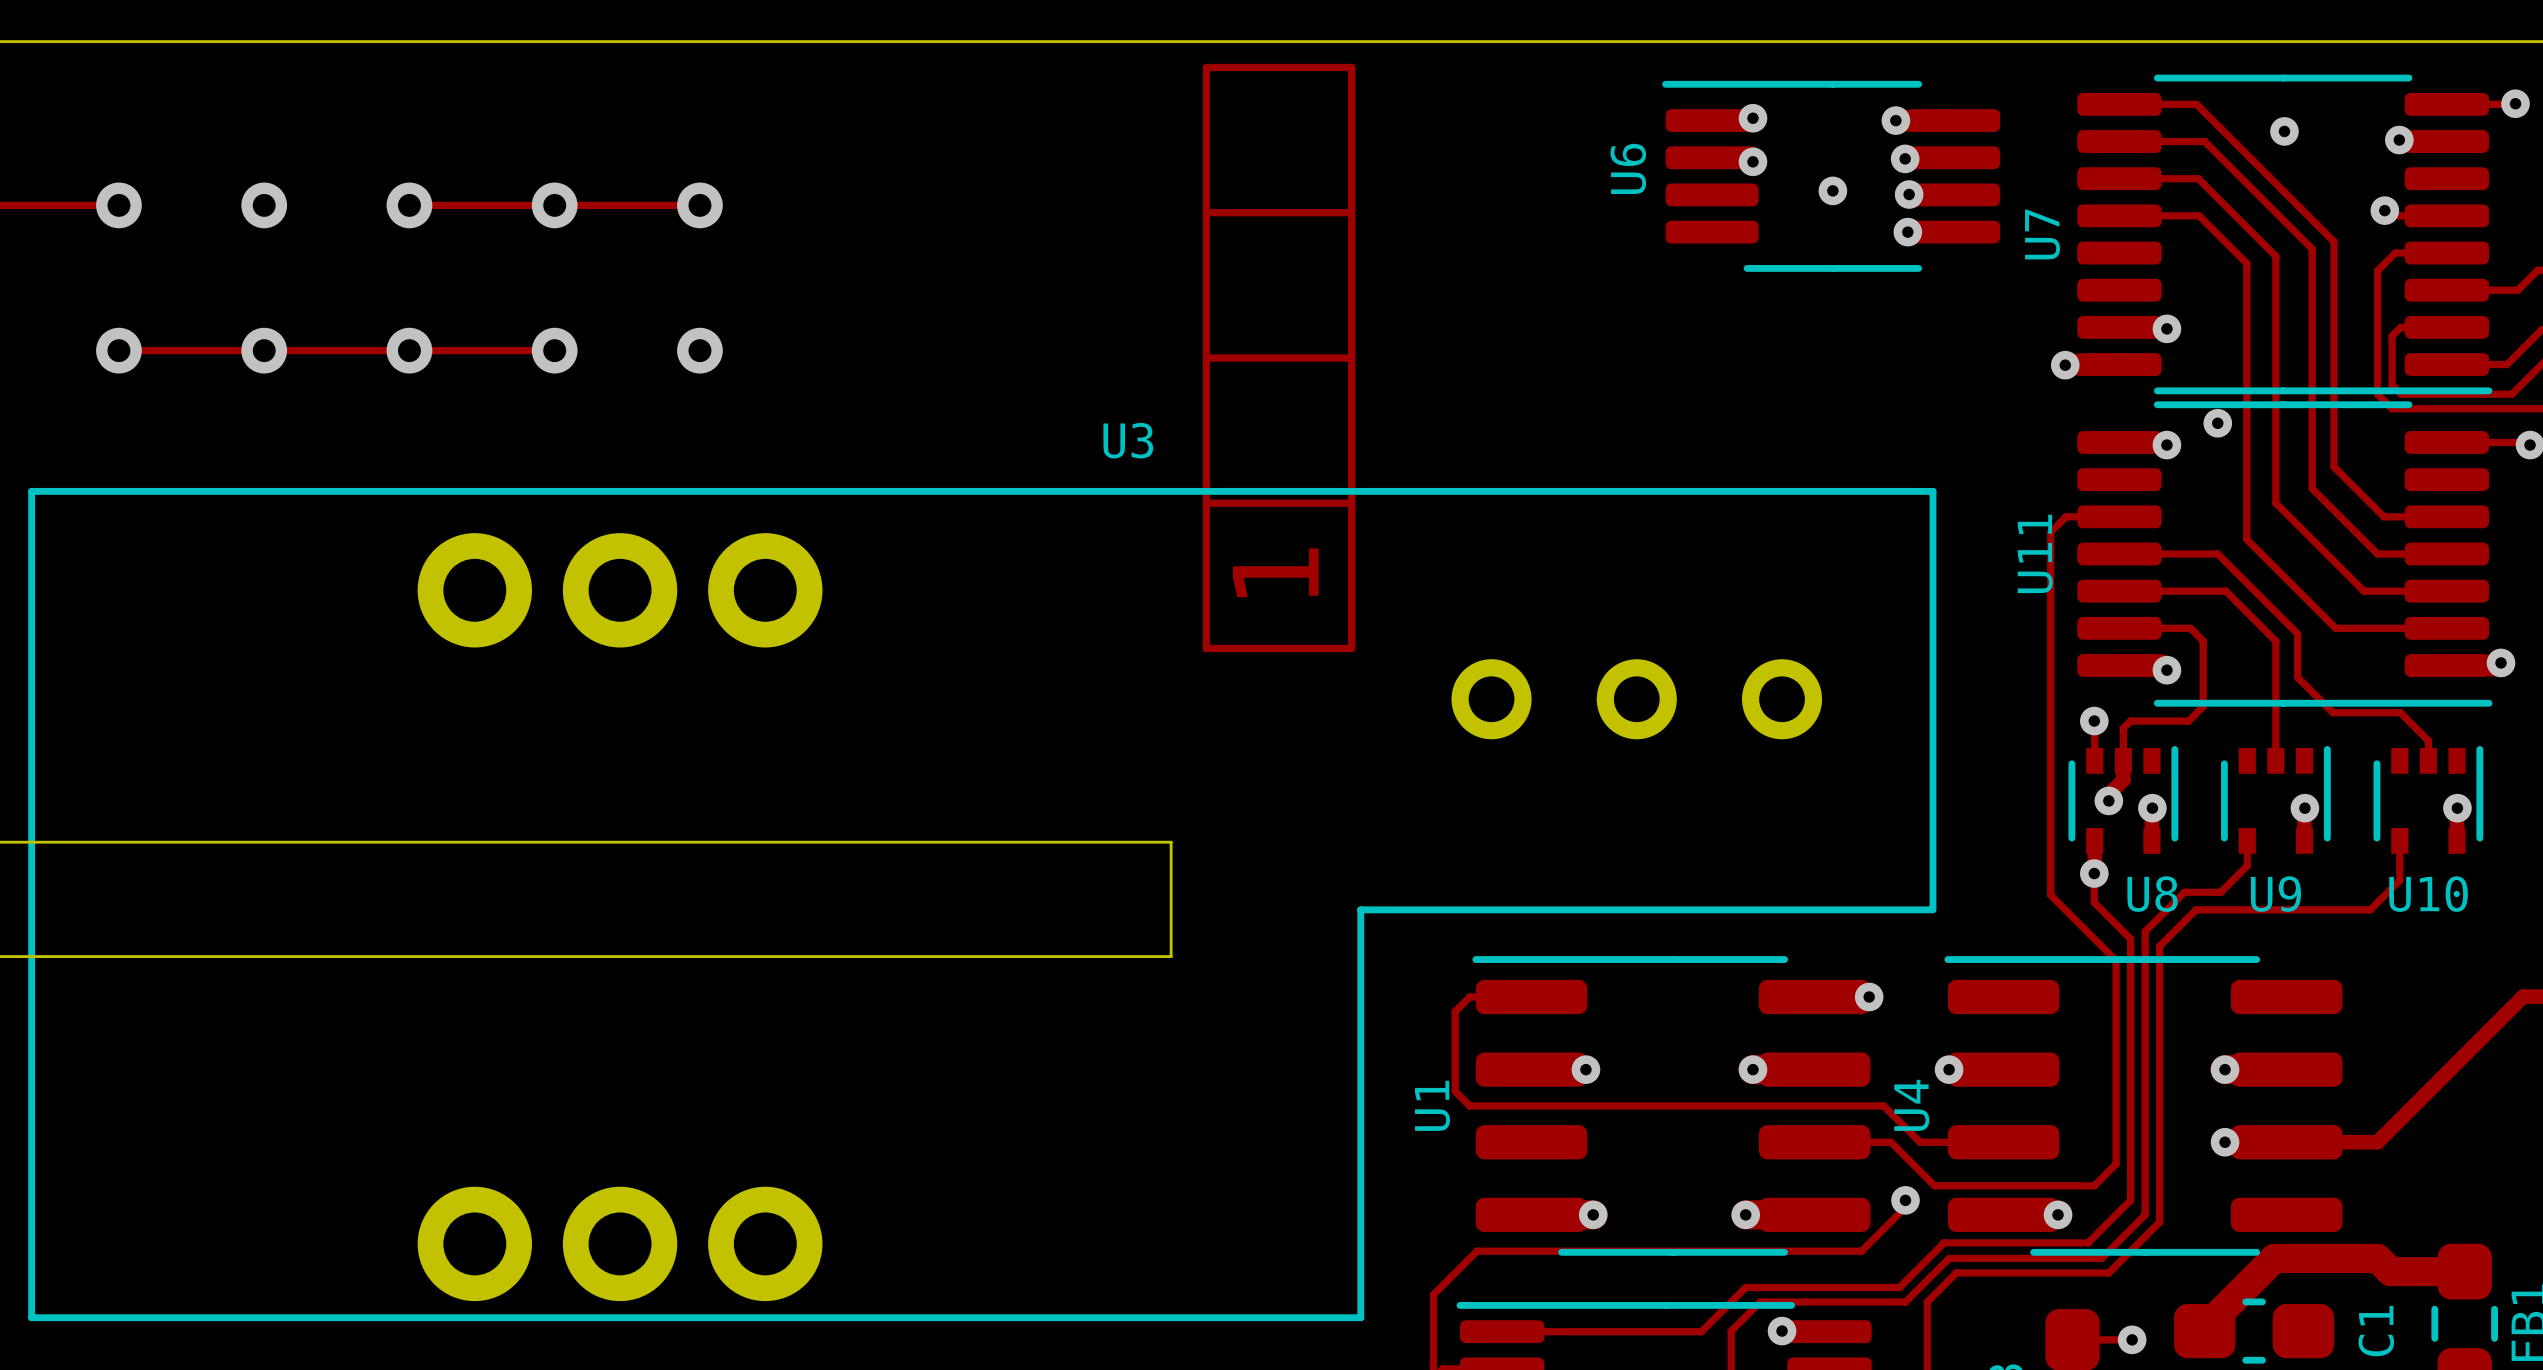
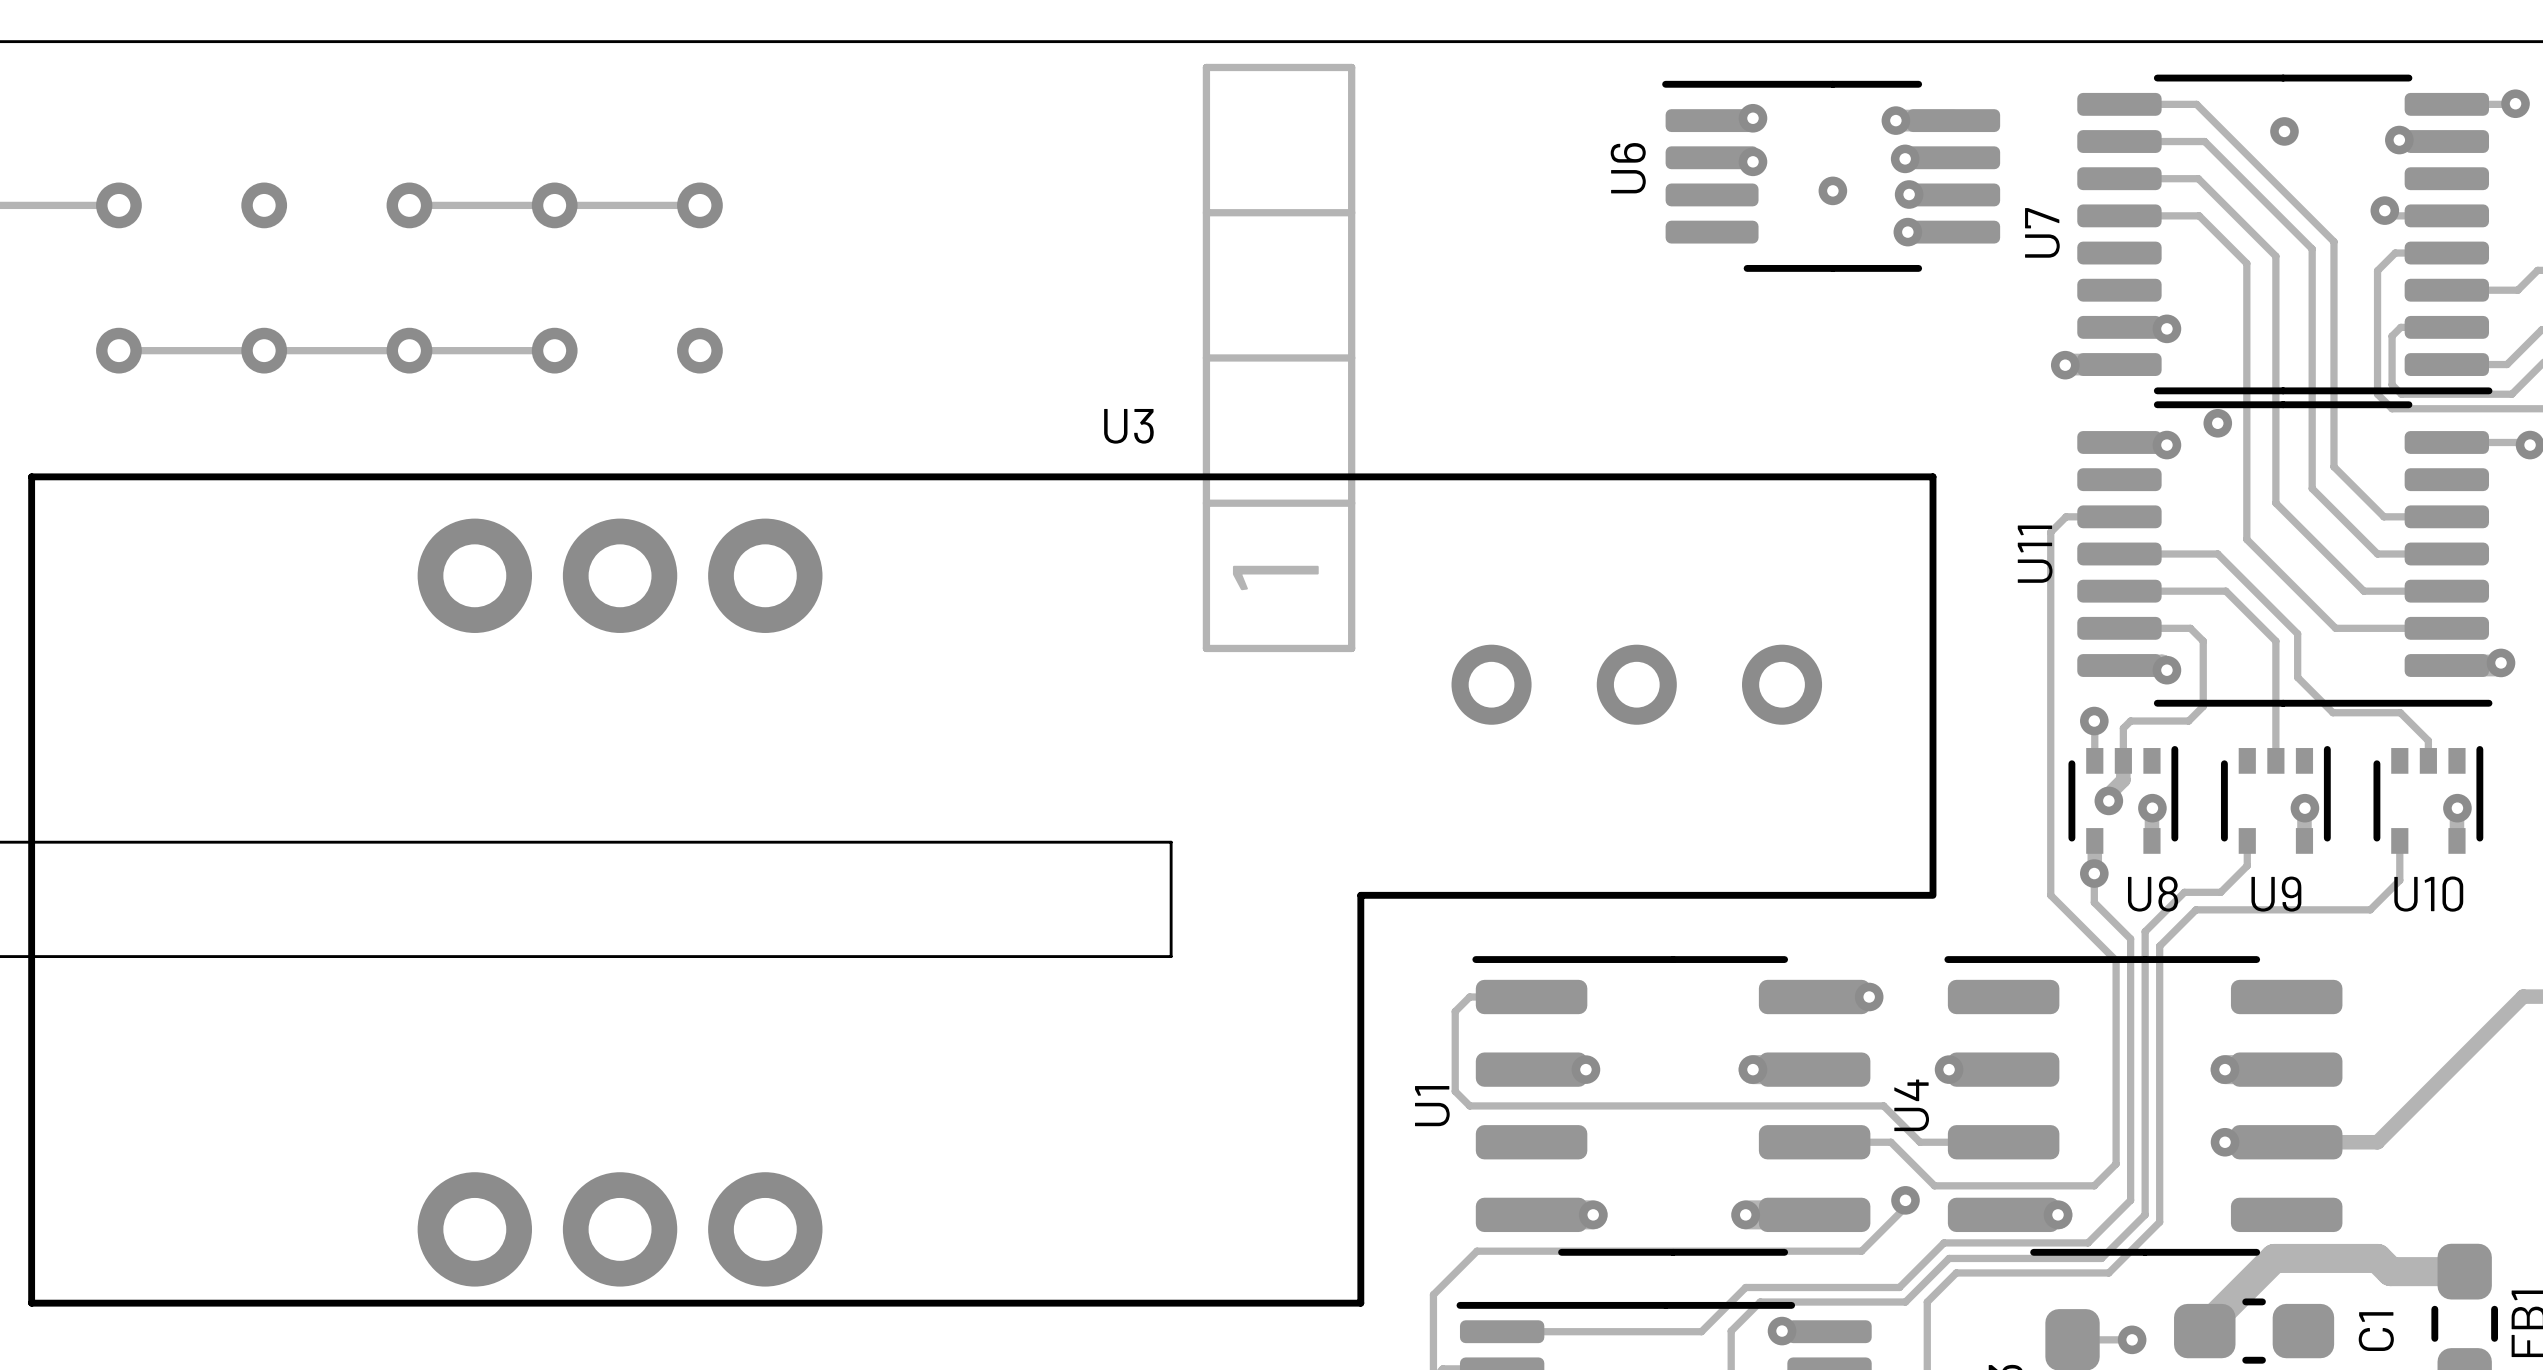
U3 position: (982, 904) -> (982, 890)

